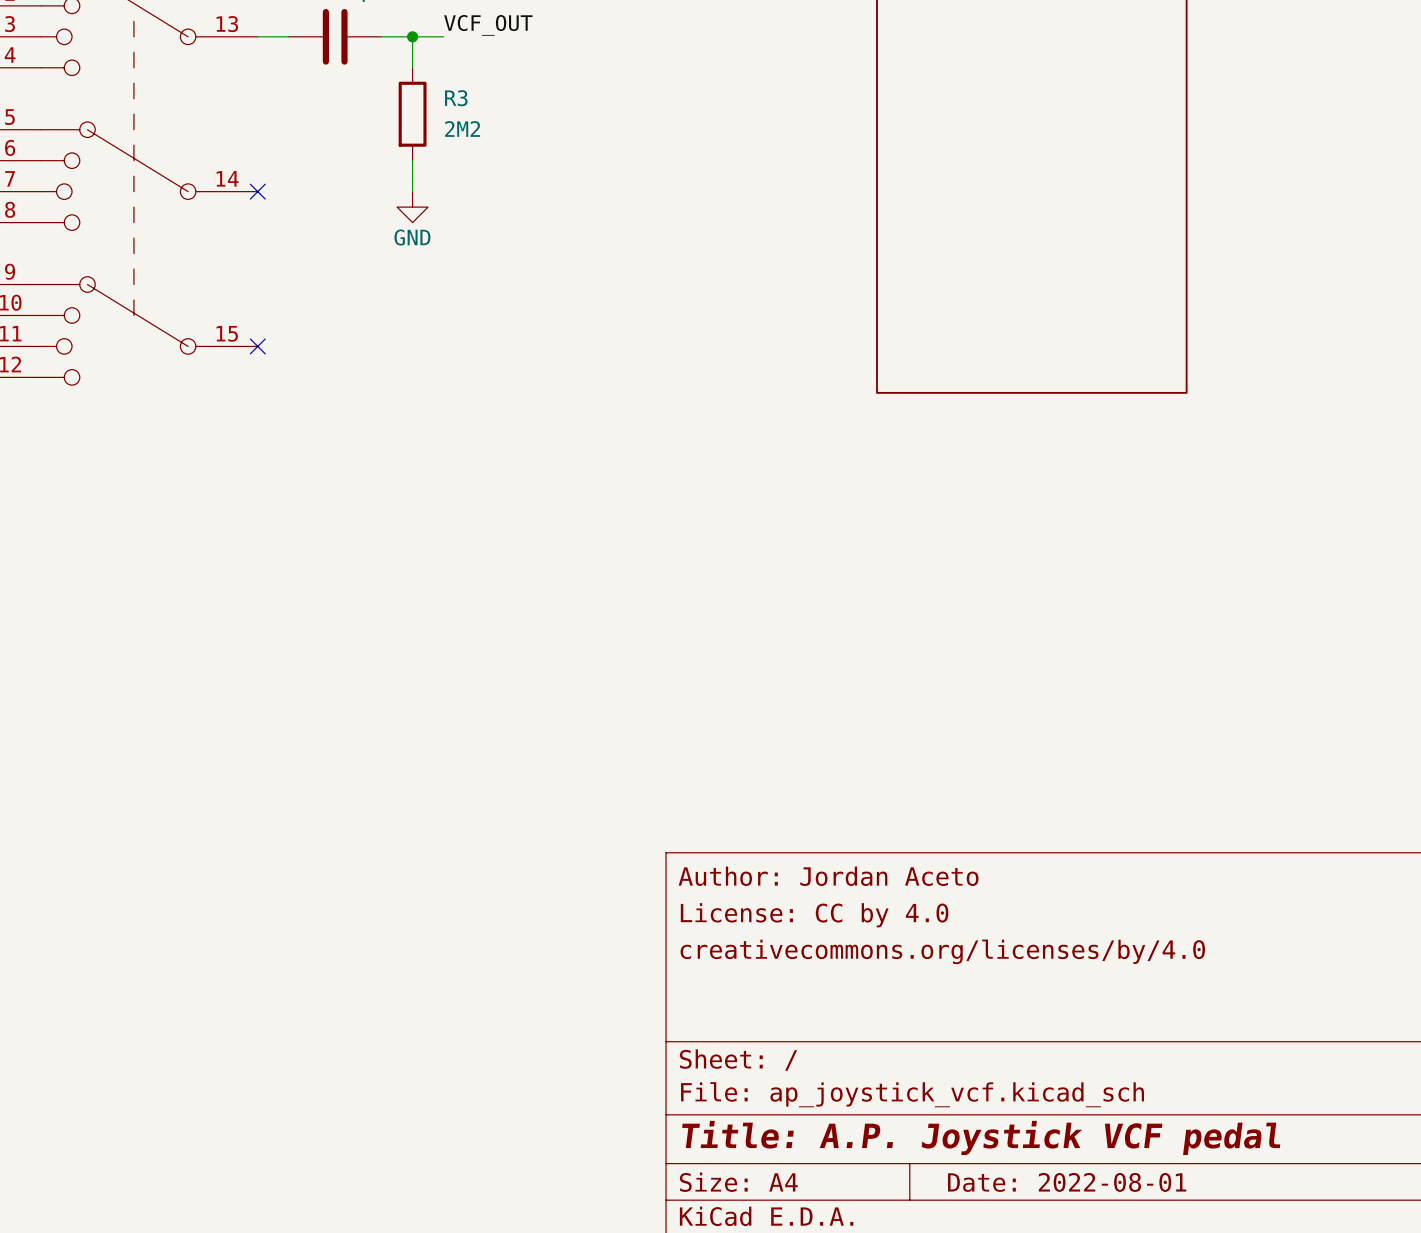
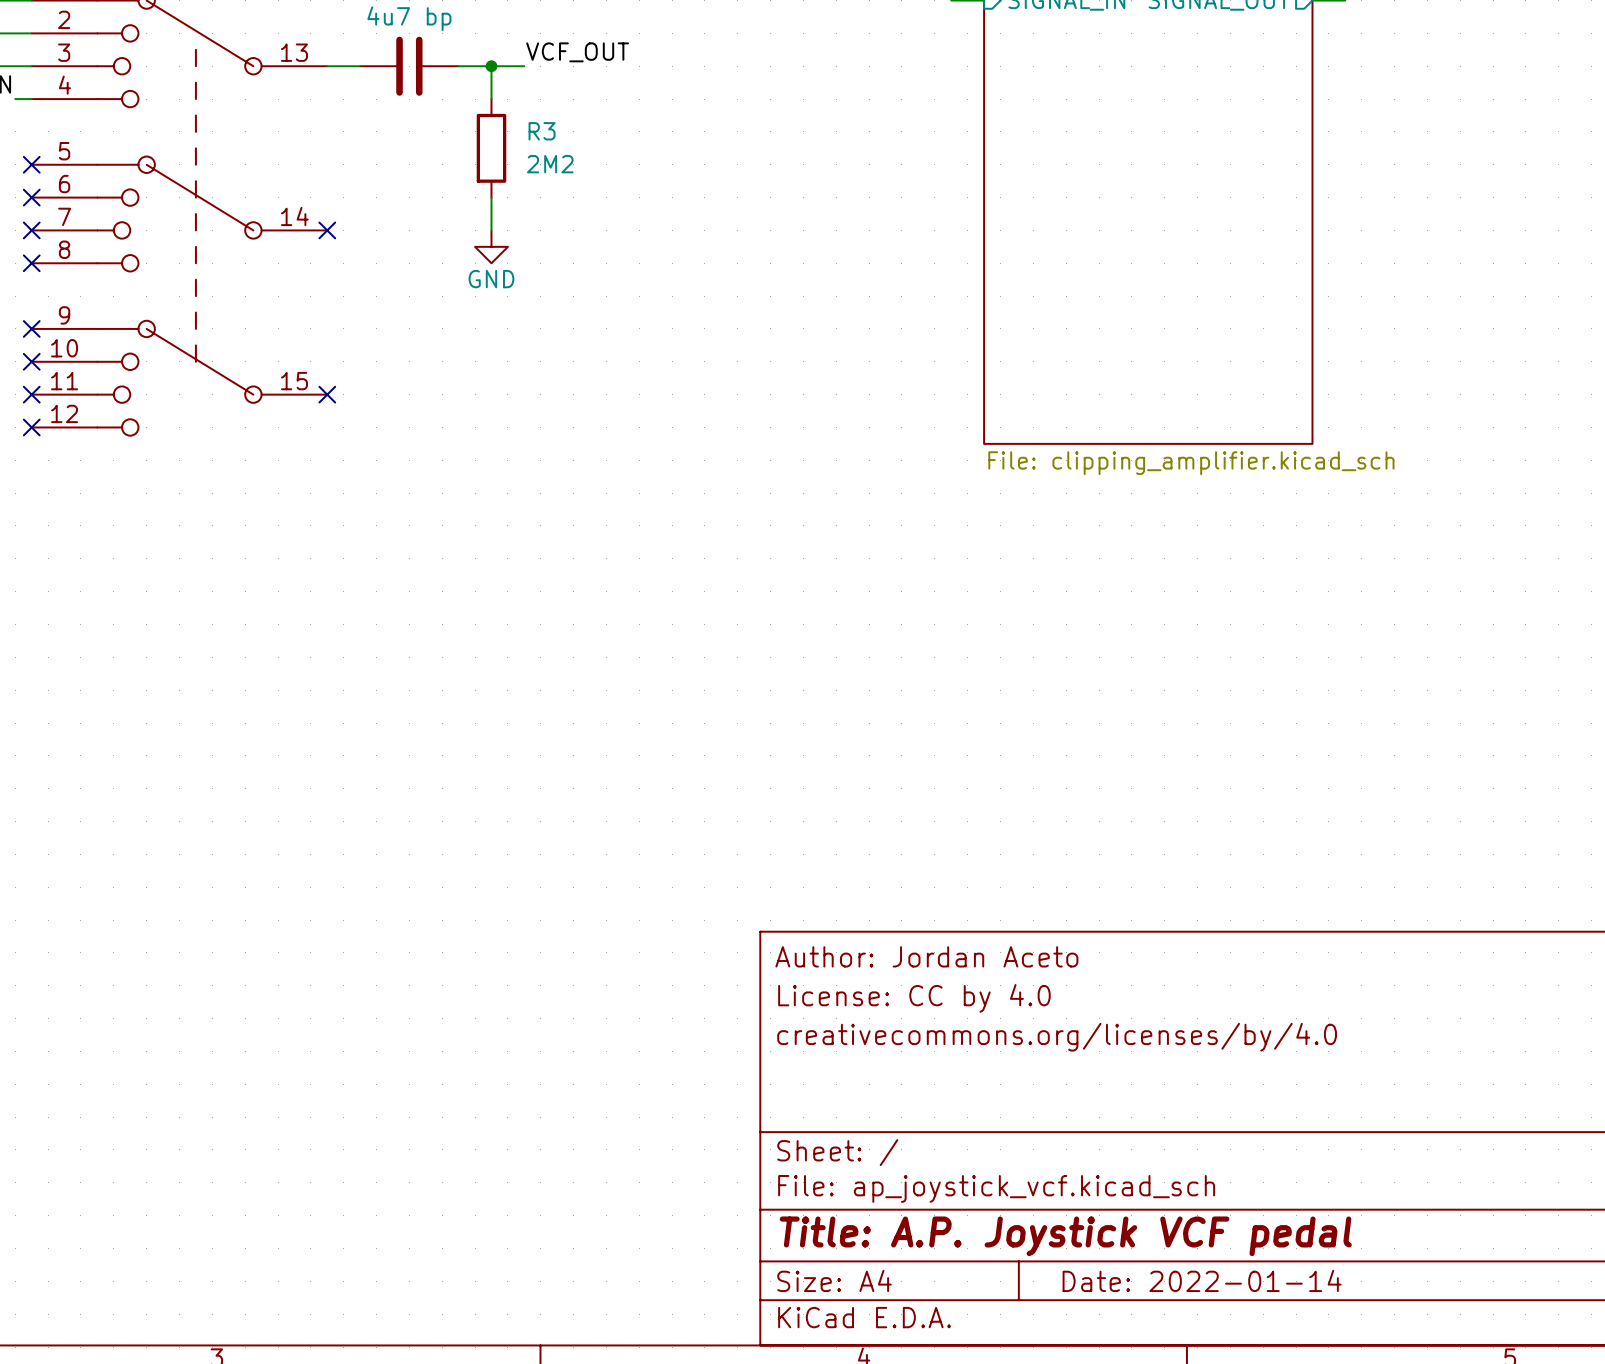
sheet value: none -> File: clipping_amplifier.kicad_sch (1191, 463)
title block: Date: 2022-08-01 (1067, 1182) -> Date: 2022-01-14 (1202, 1280)

